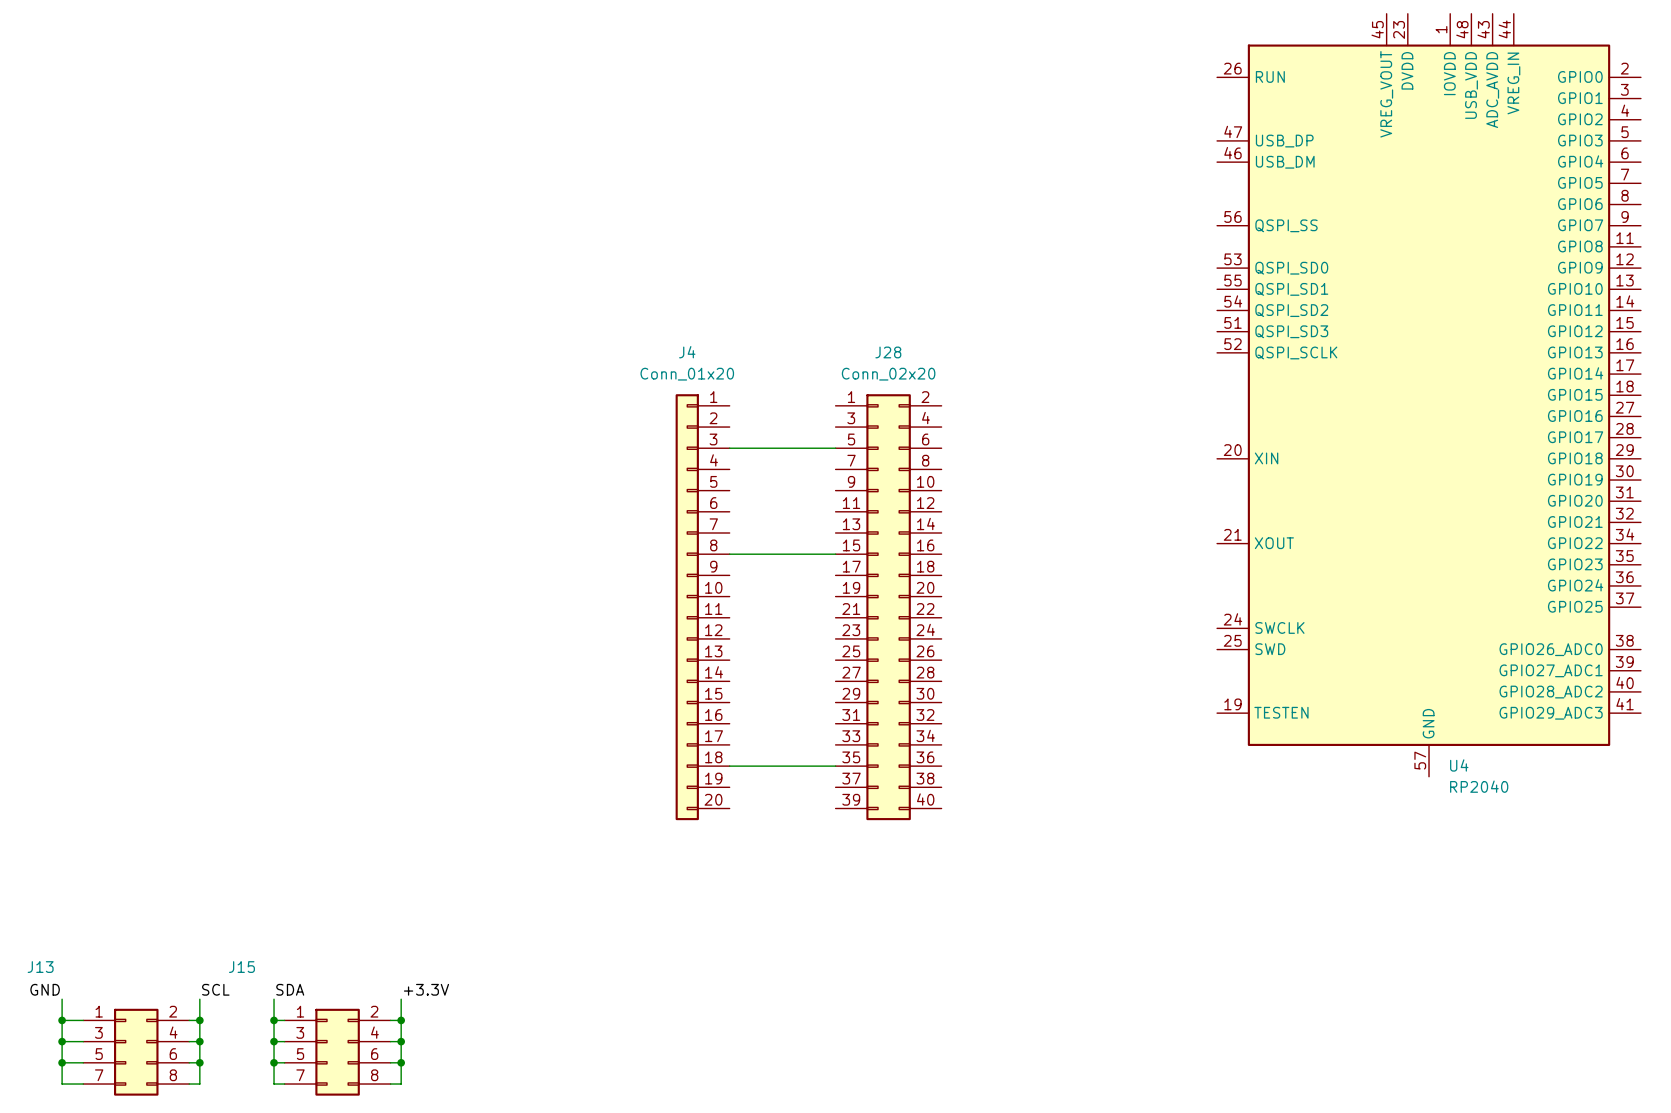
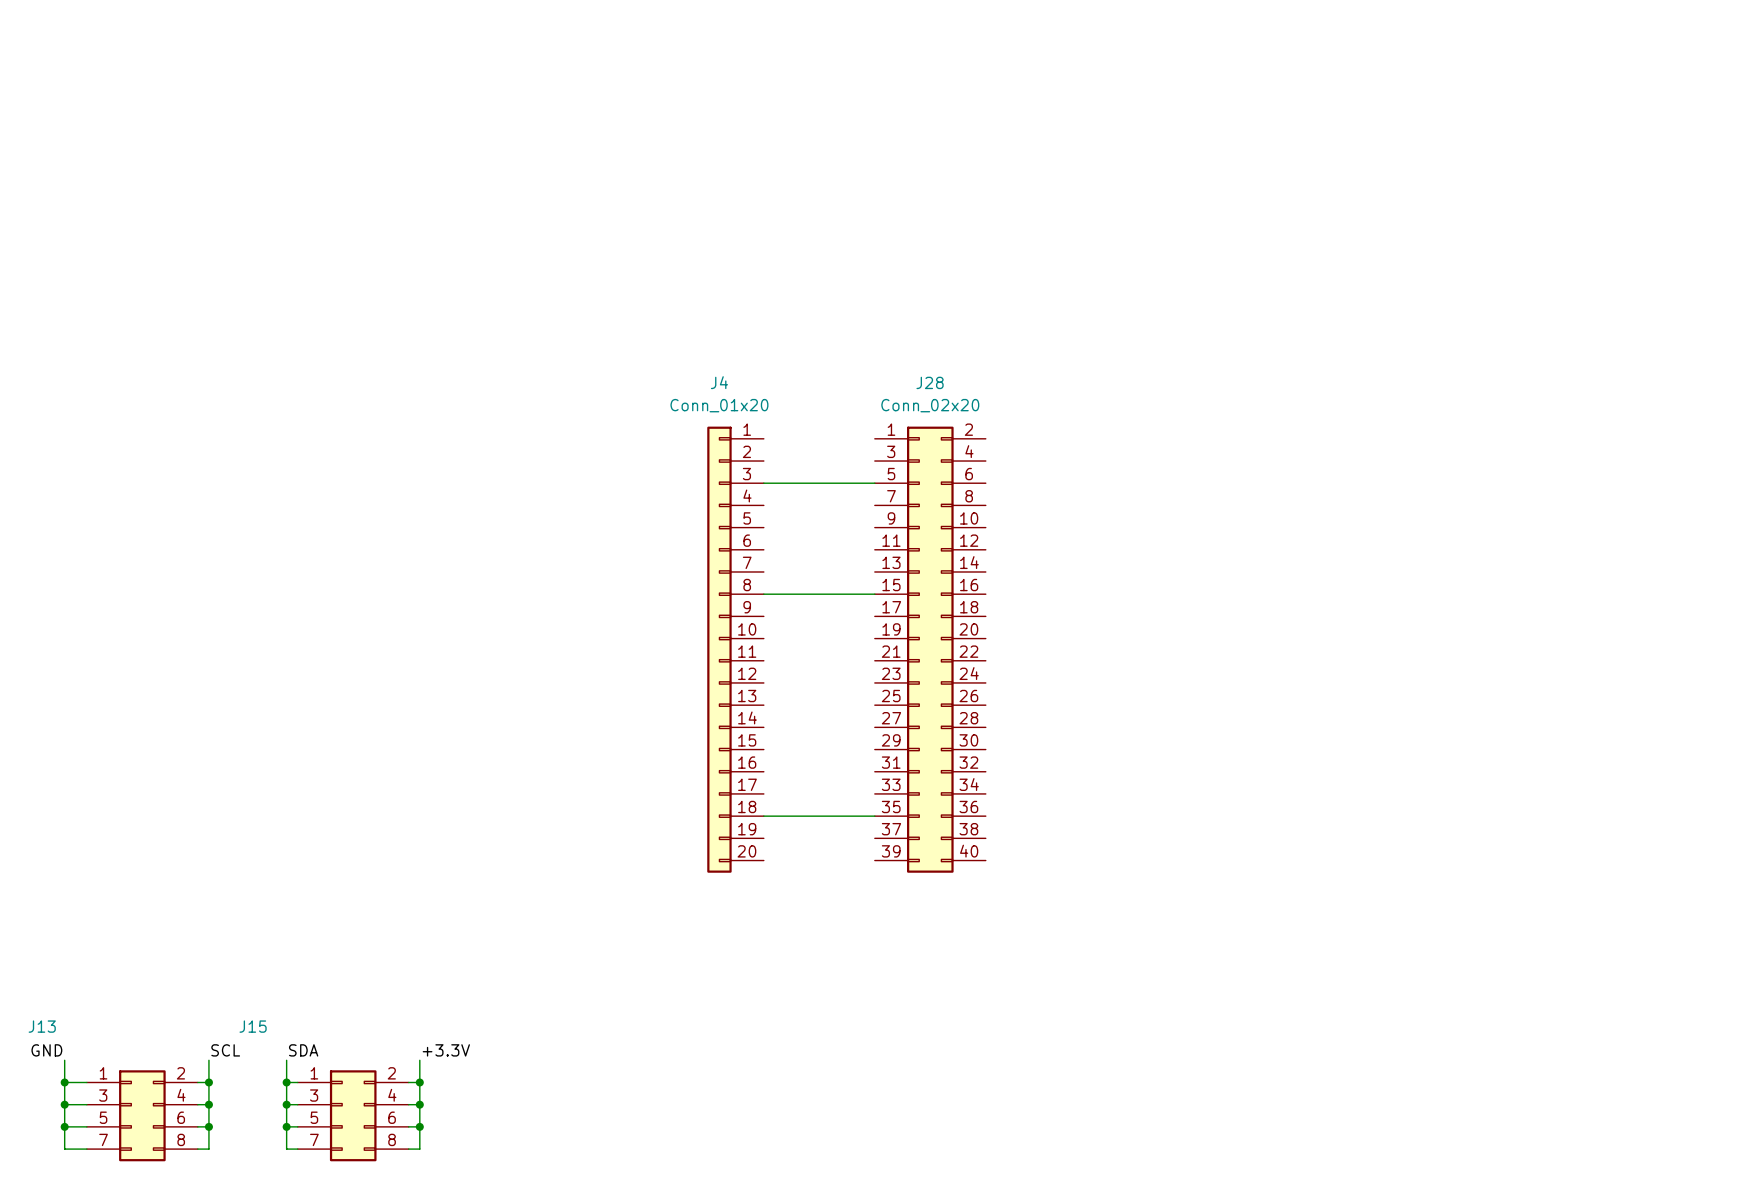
U4: RP2040 (1429, 395) -> none

